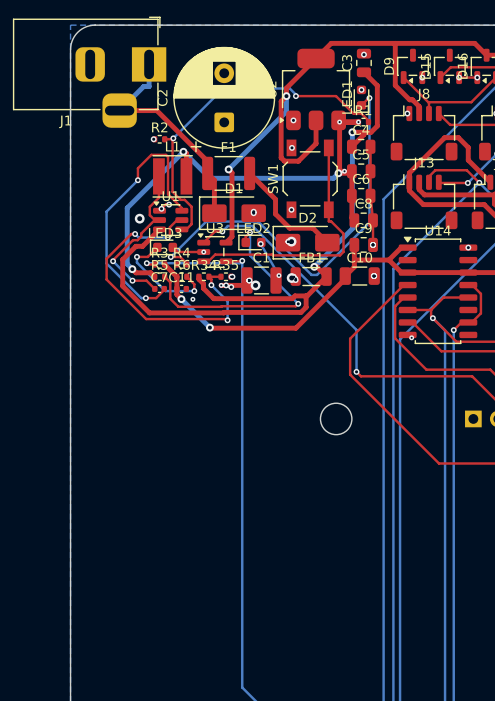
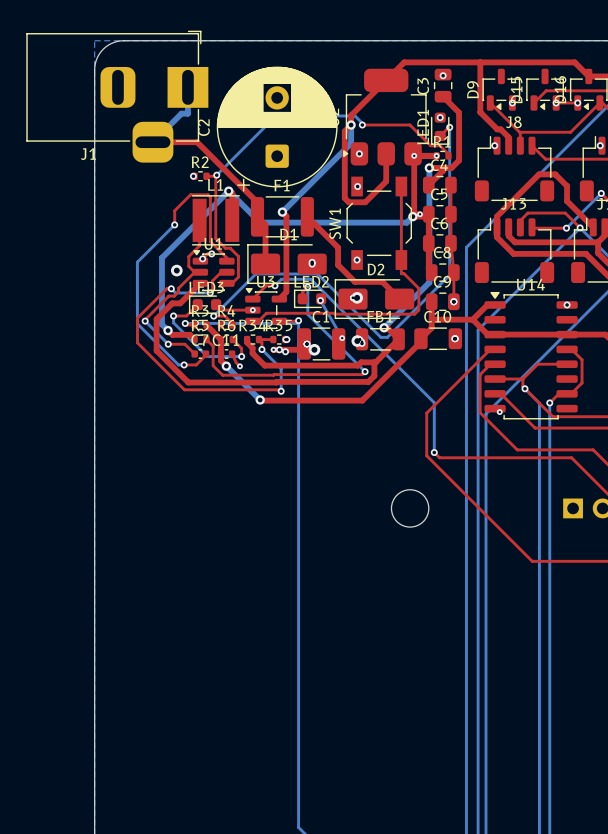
top track: none -> (232, 354) (239, 366)

